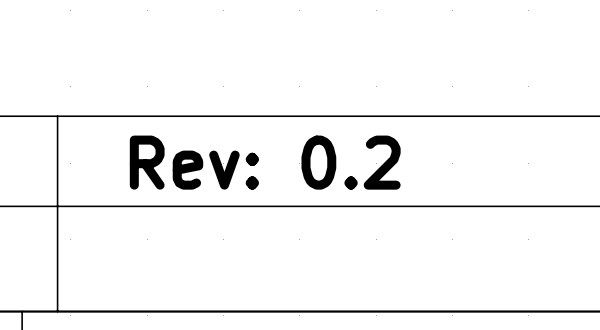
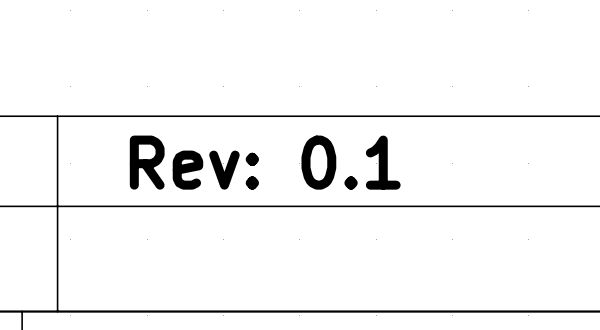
title block: Rev: 0.2 (265, 162) -> Rev: 0.1 (265, 162)

